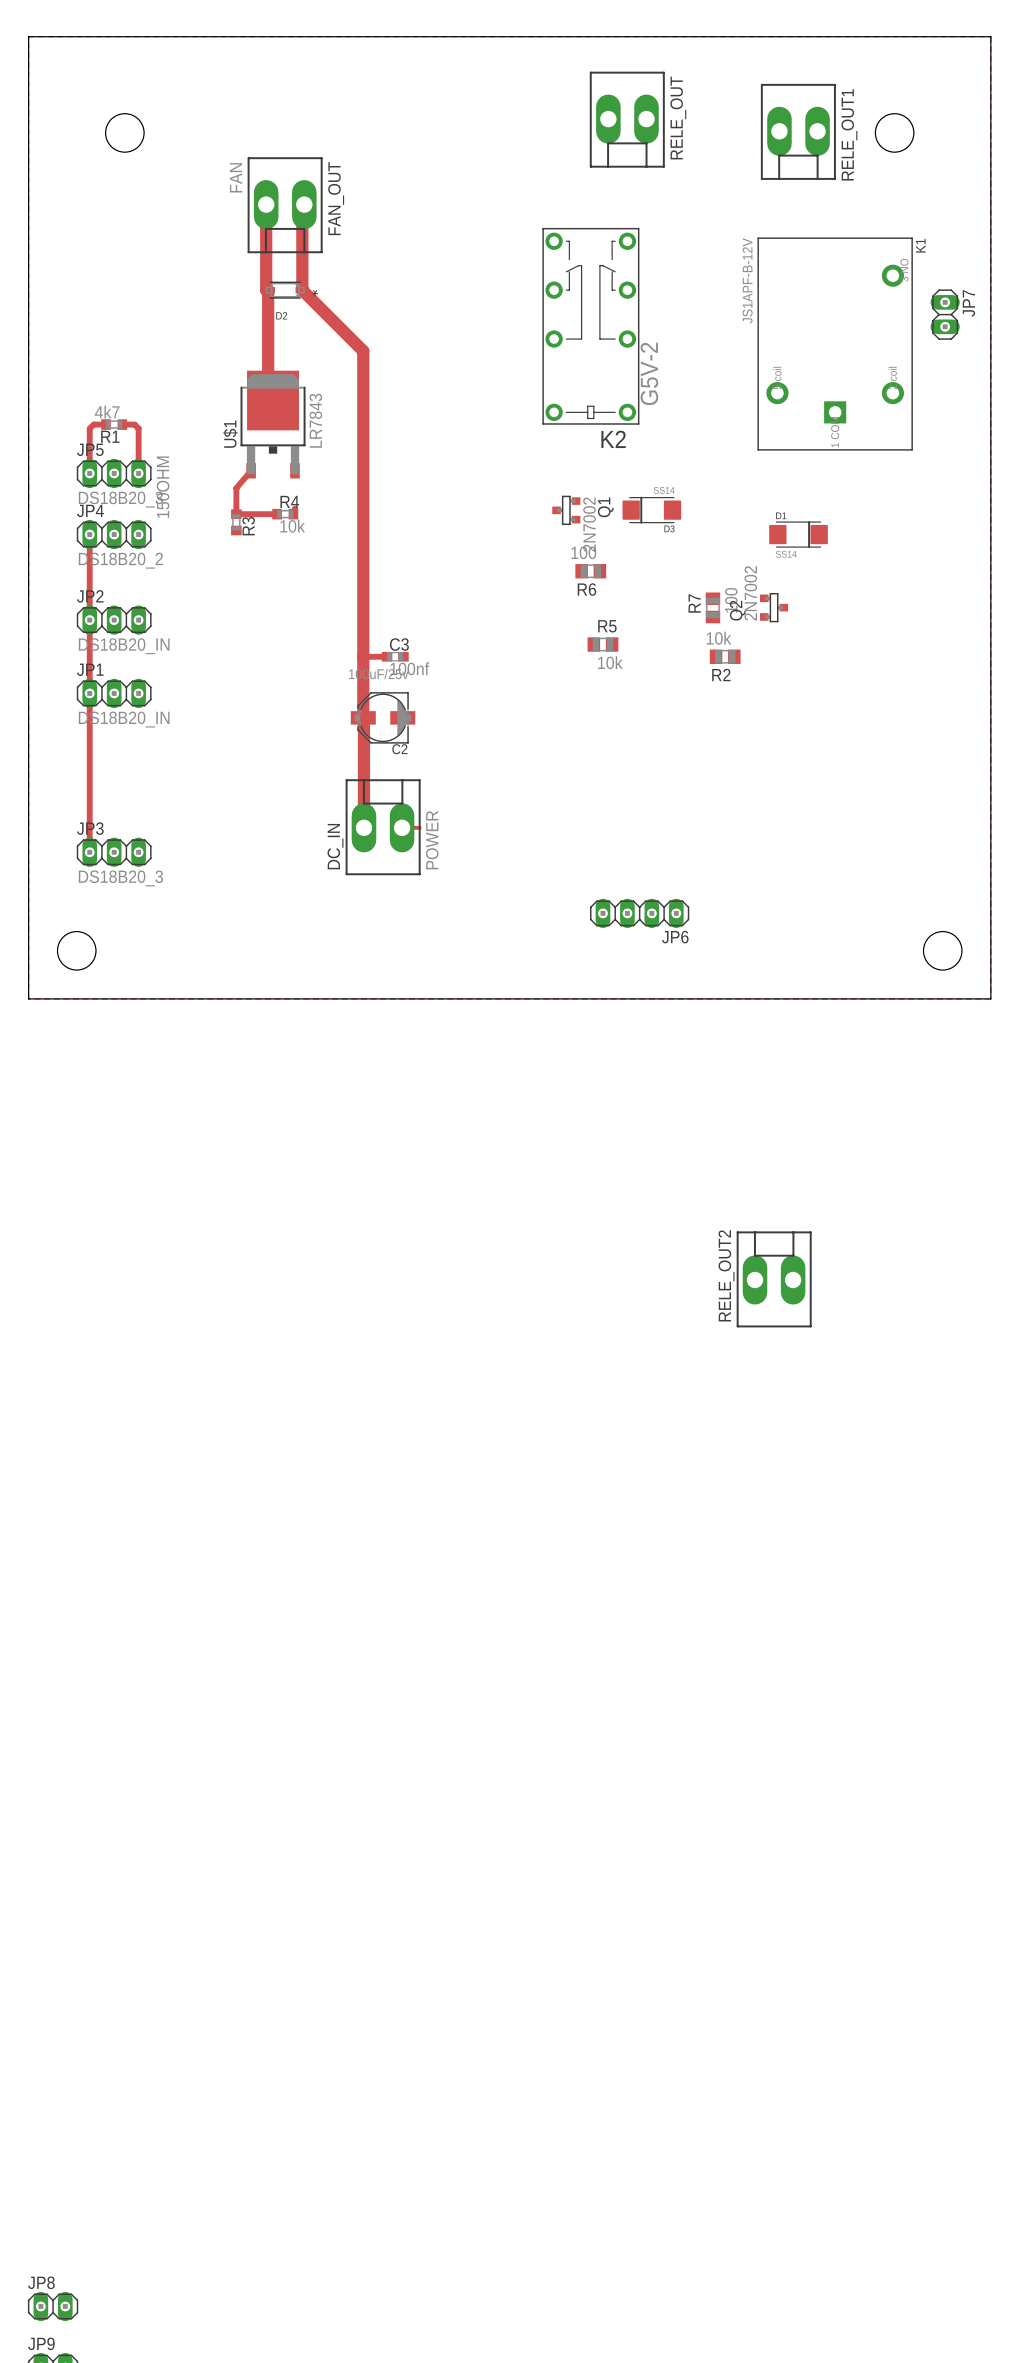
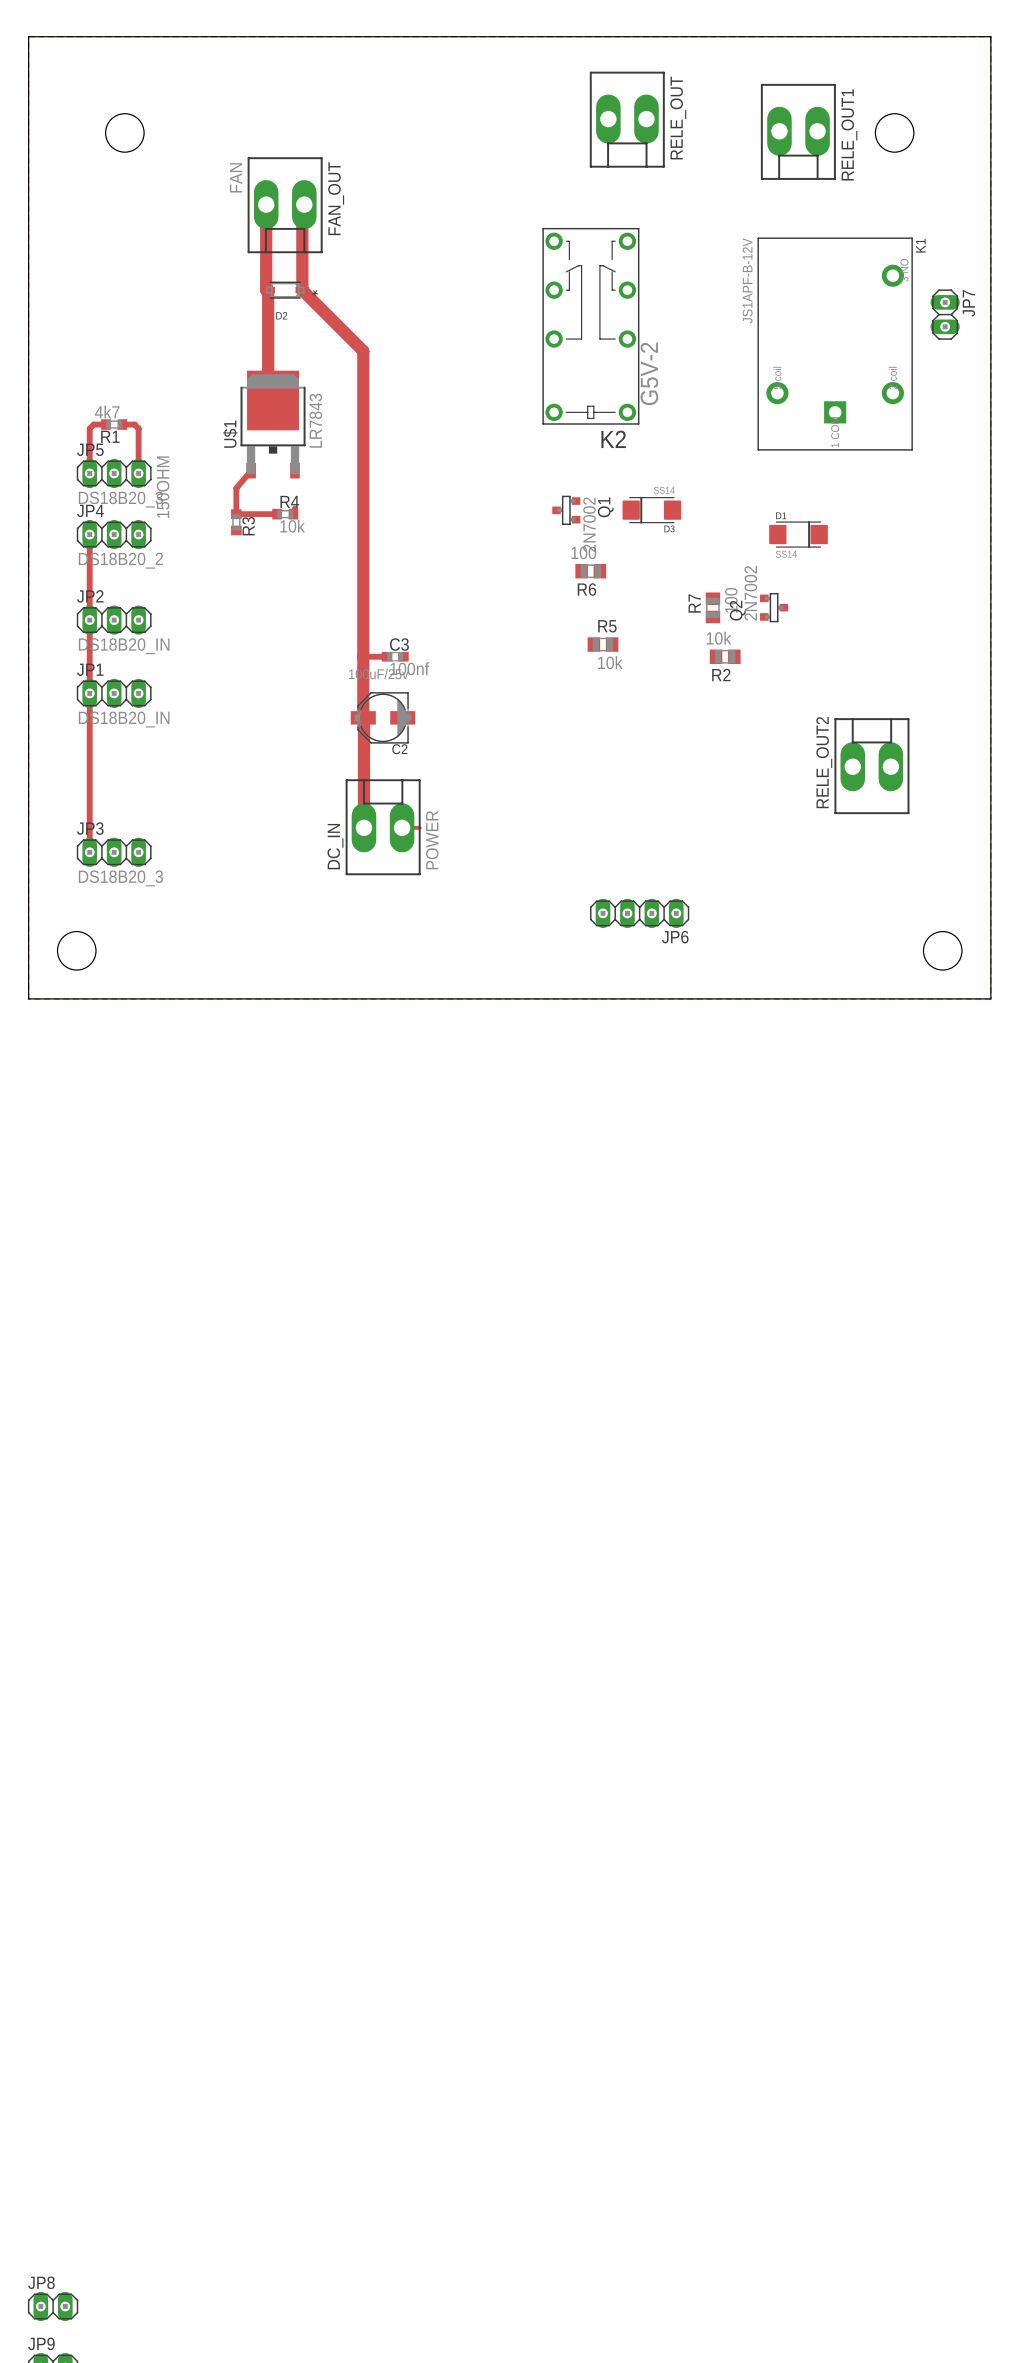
RELE_OUT2 position: (774, 1279) -> (871, 766)

